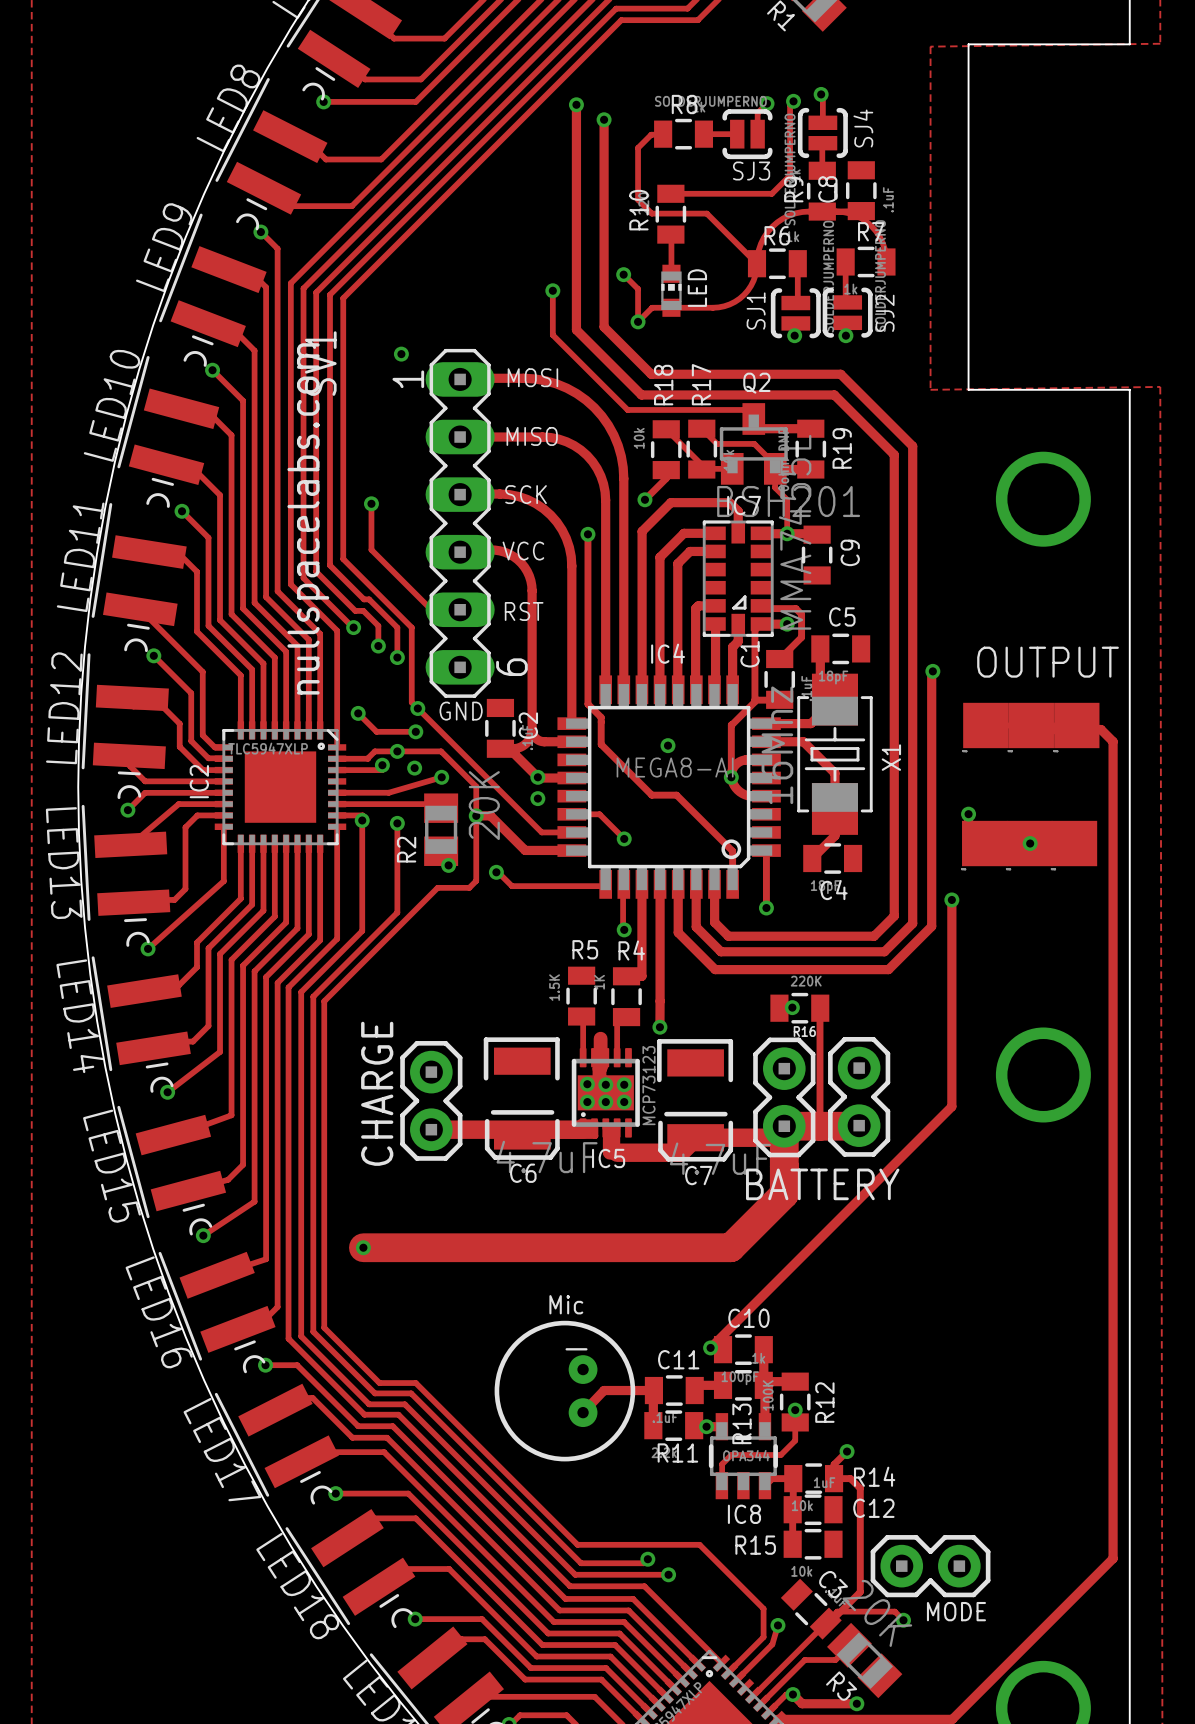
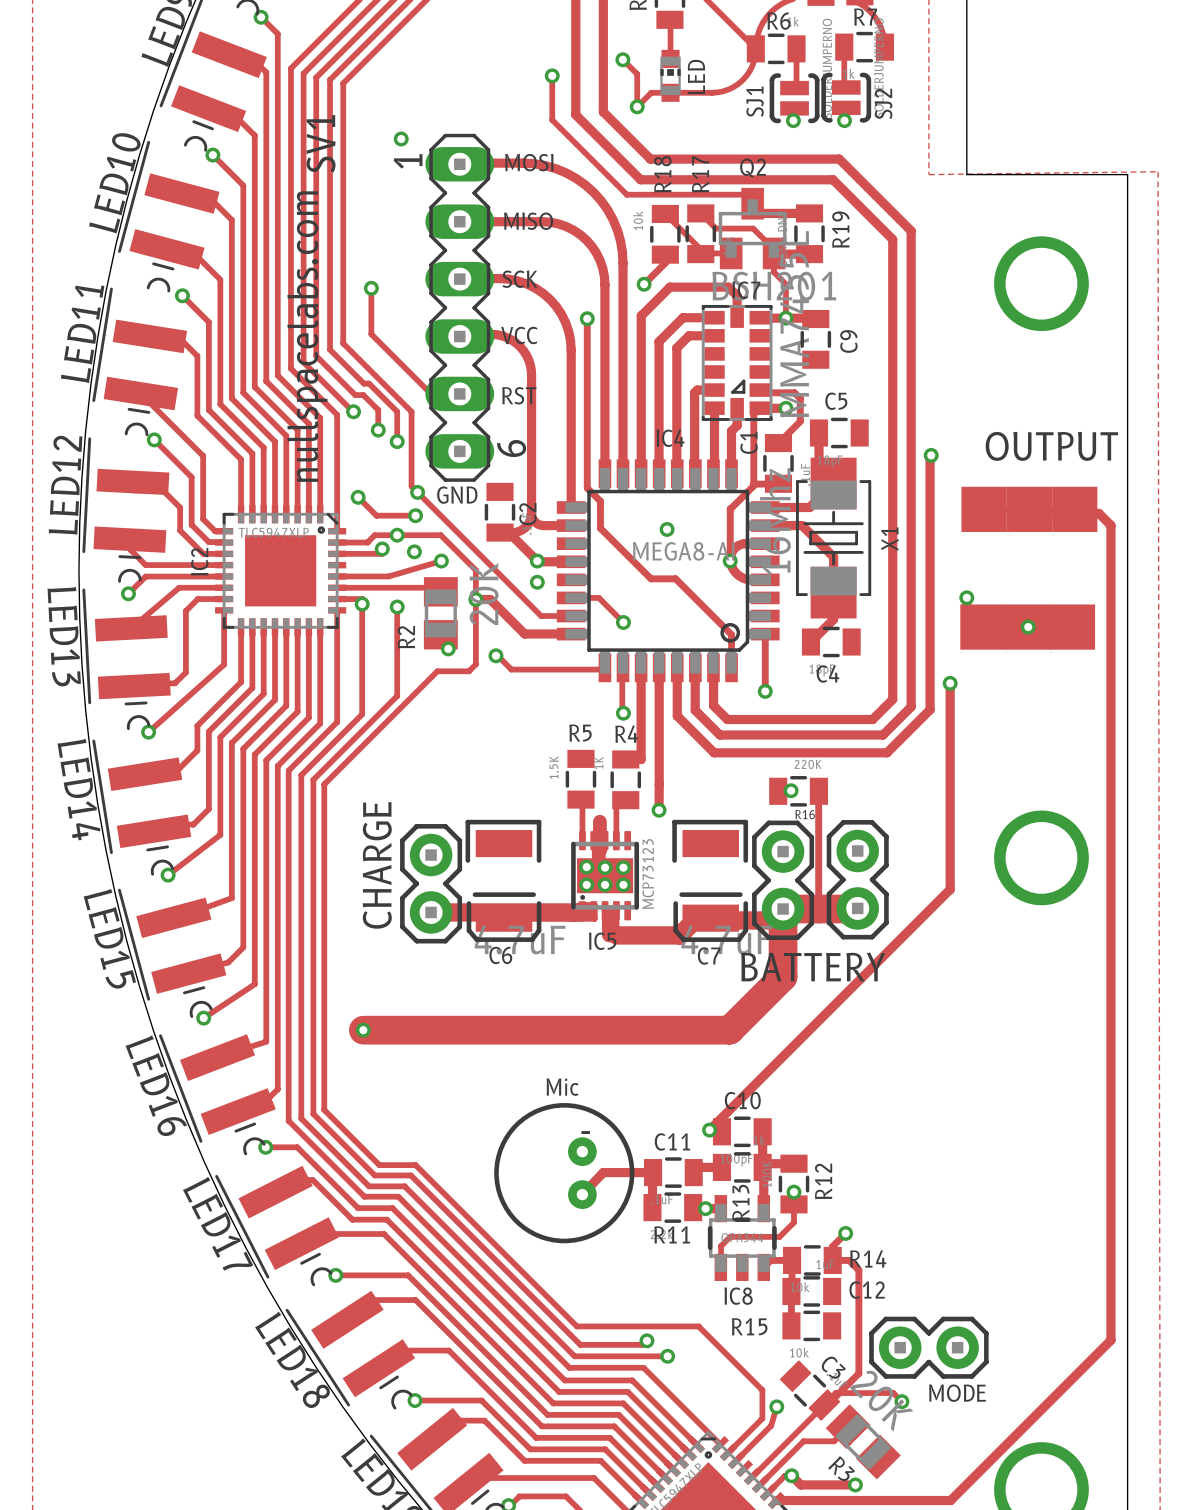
C6 position: (521, 1098) -> (503, 880)
C7 position: (695, 1100) -> (710, 880)

